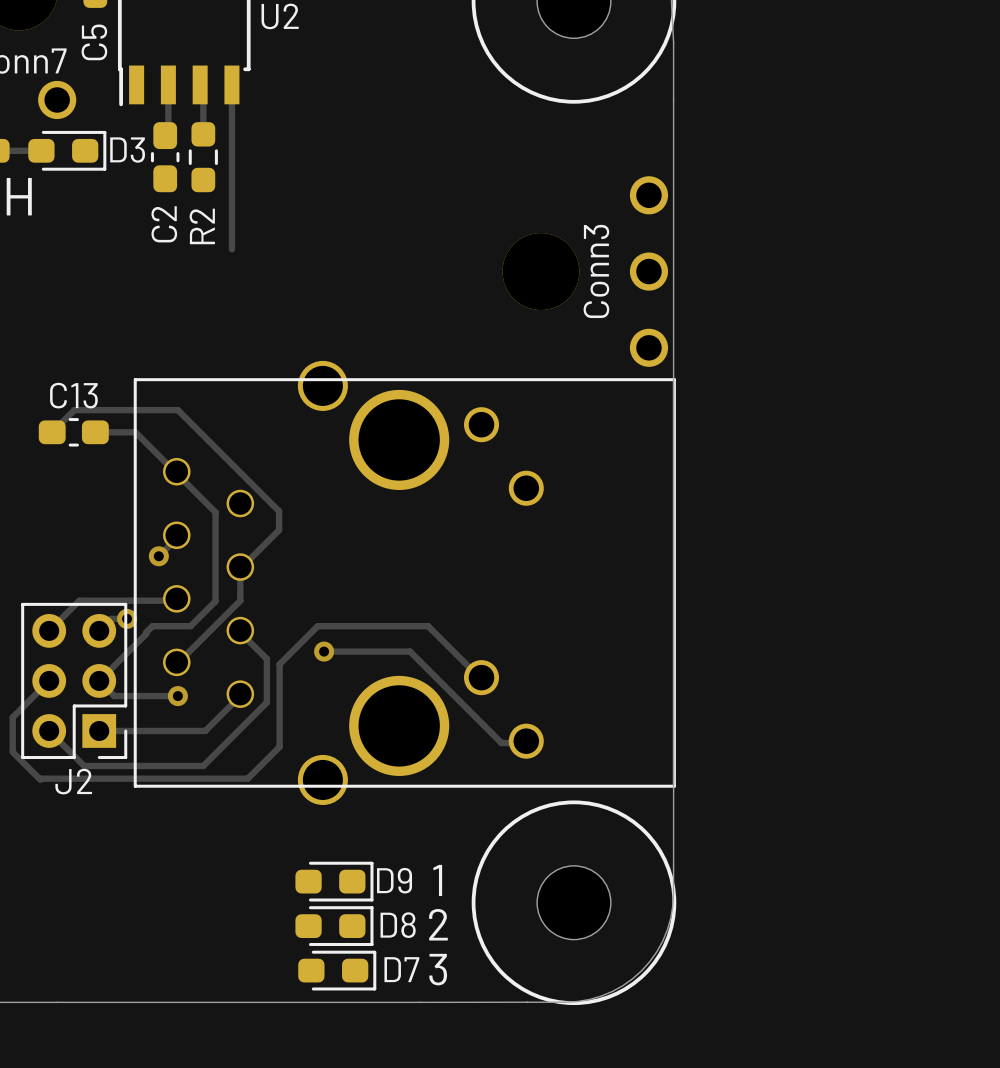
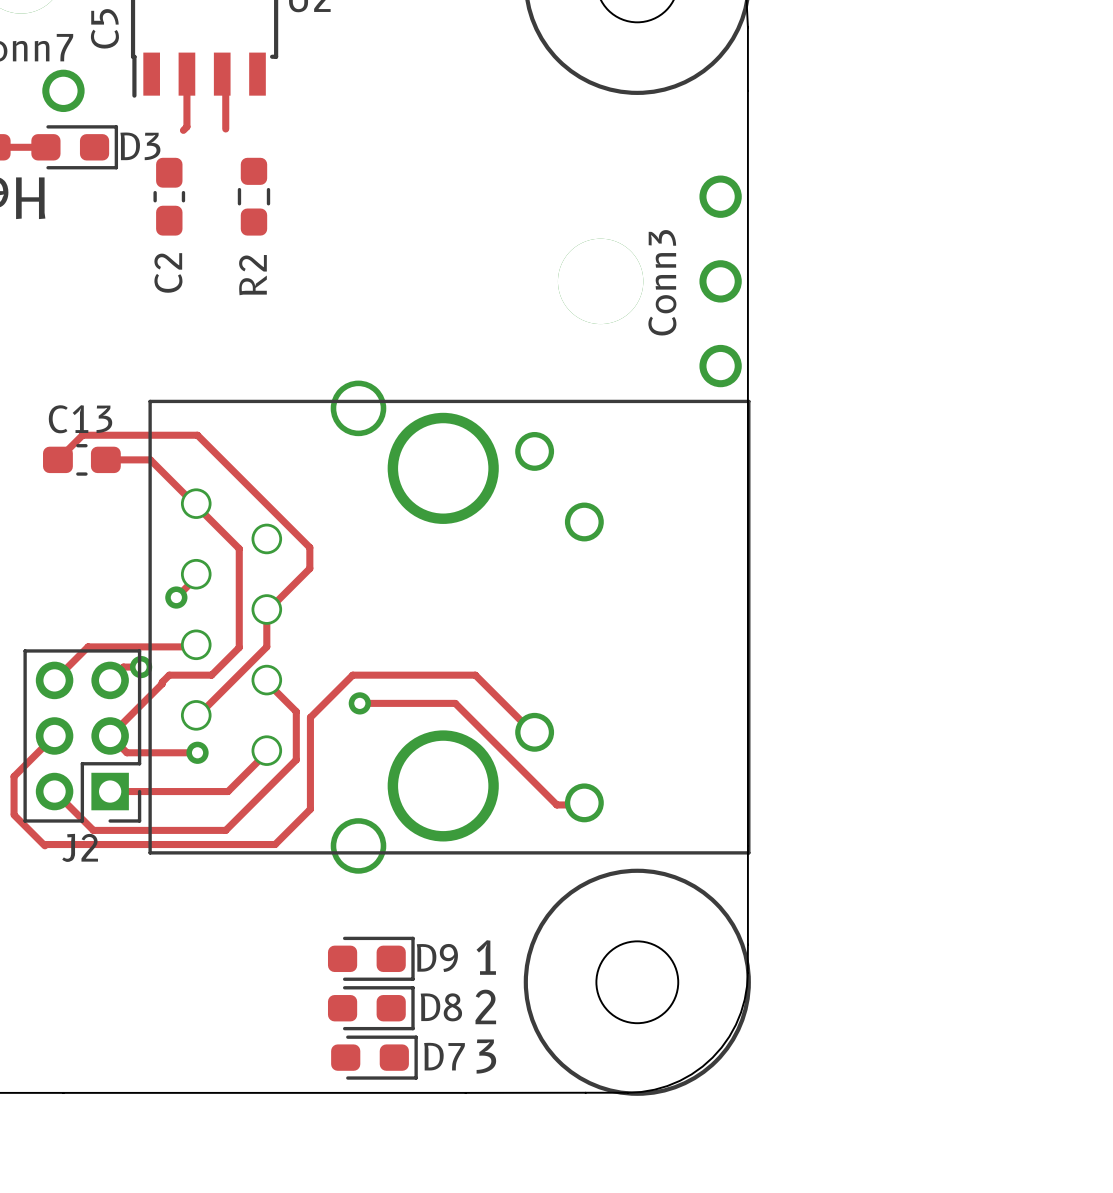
track: (231, 84) (231, 249) -> none
C2 position: (165, 157) -> (169, 196)
R2 position: (203, 157) -> (253, 196)

